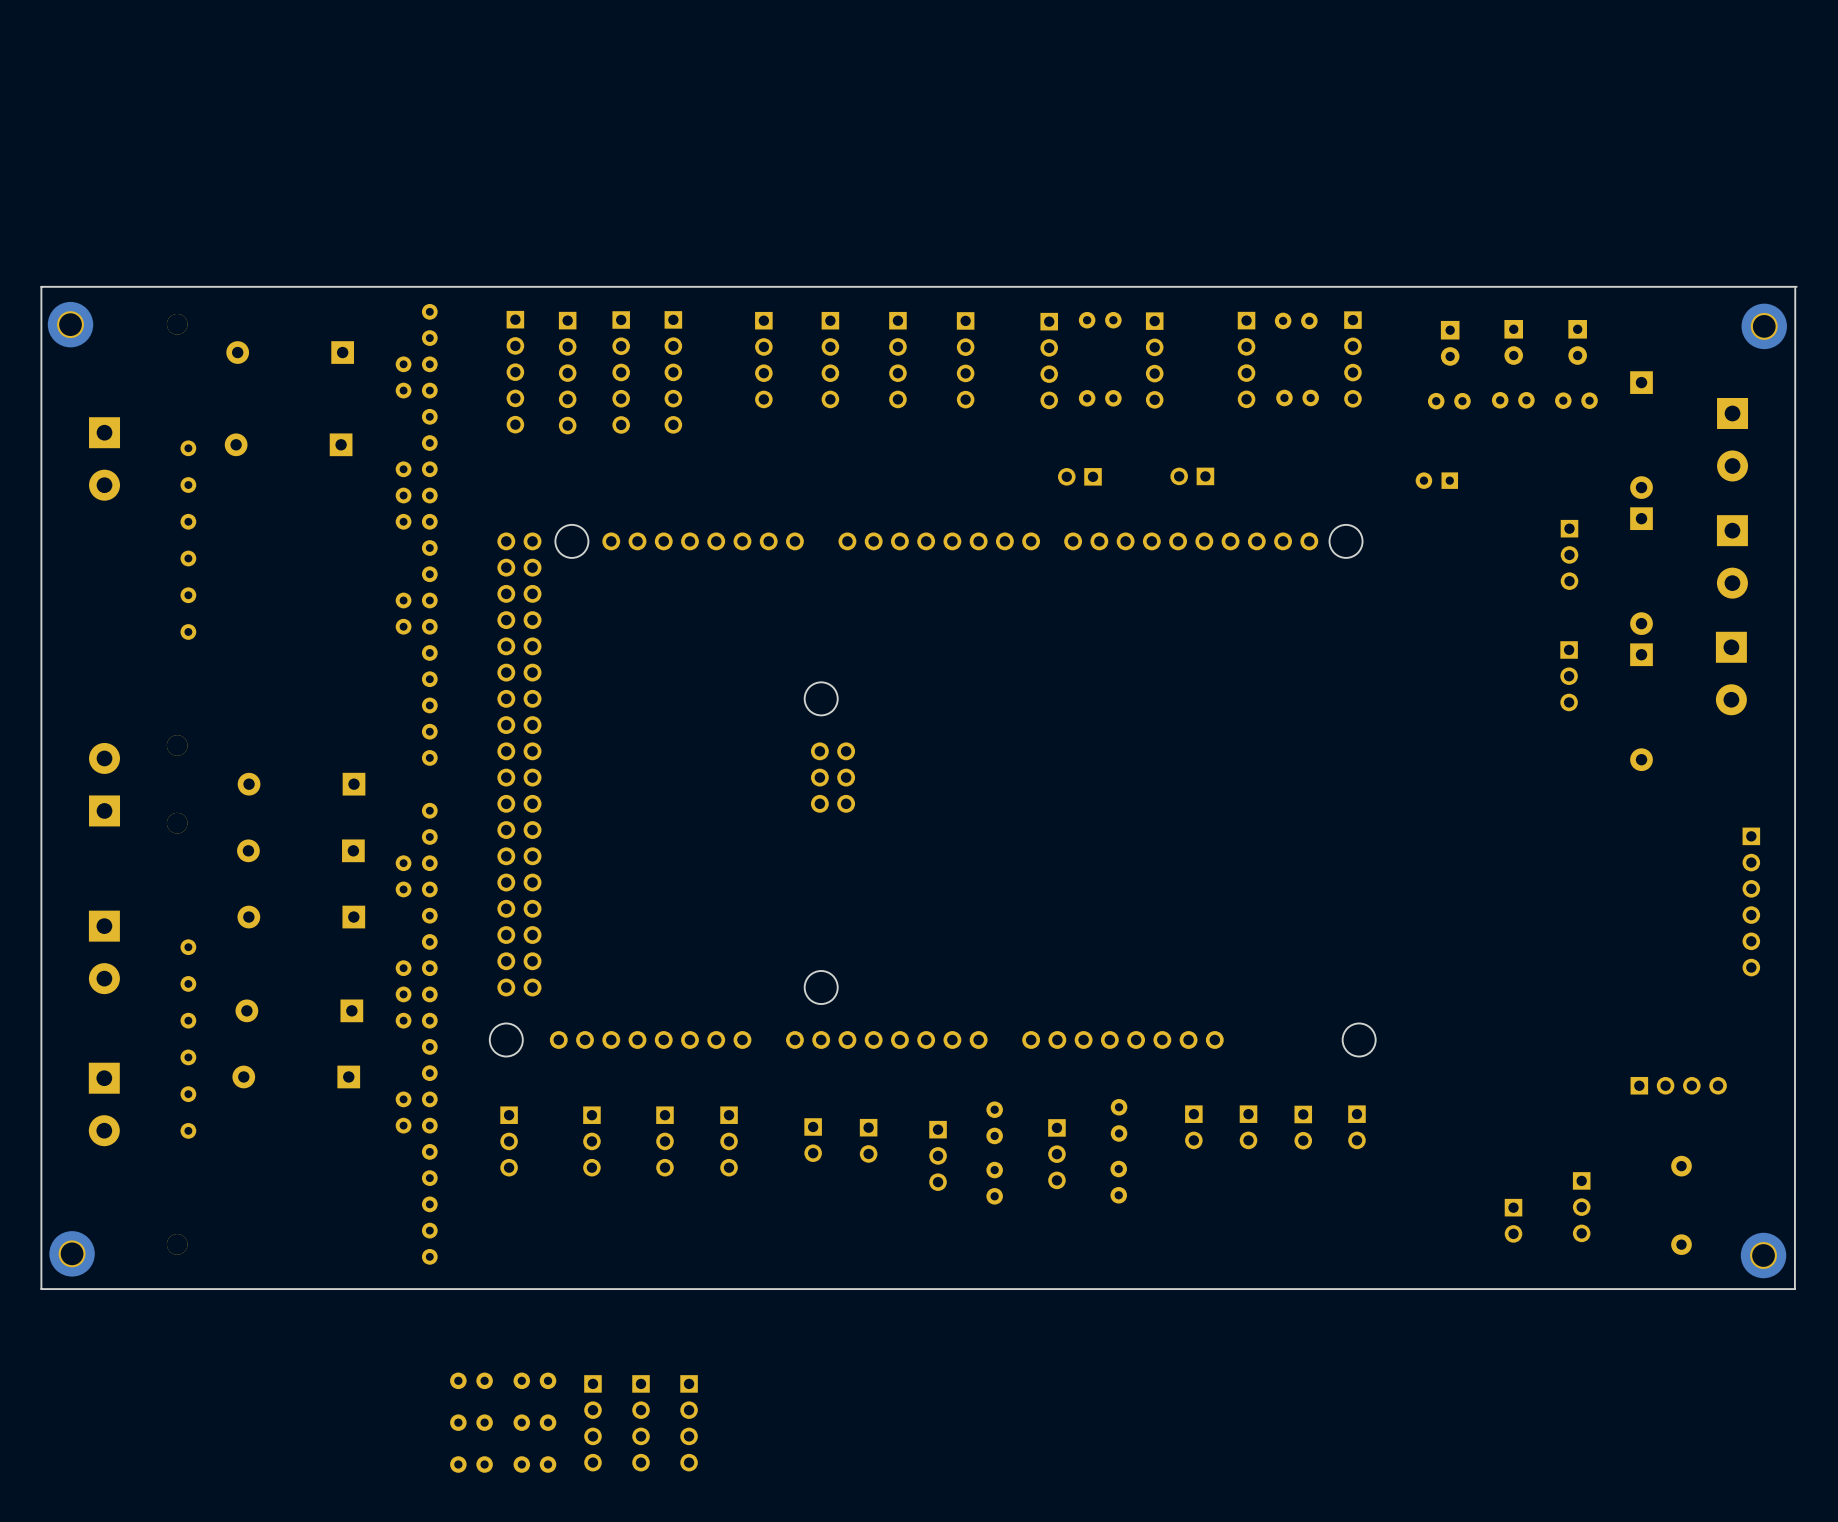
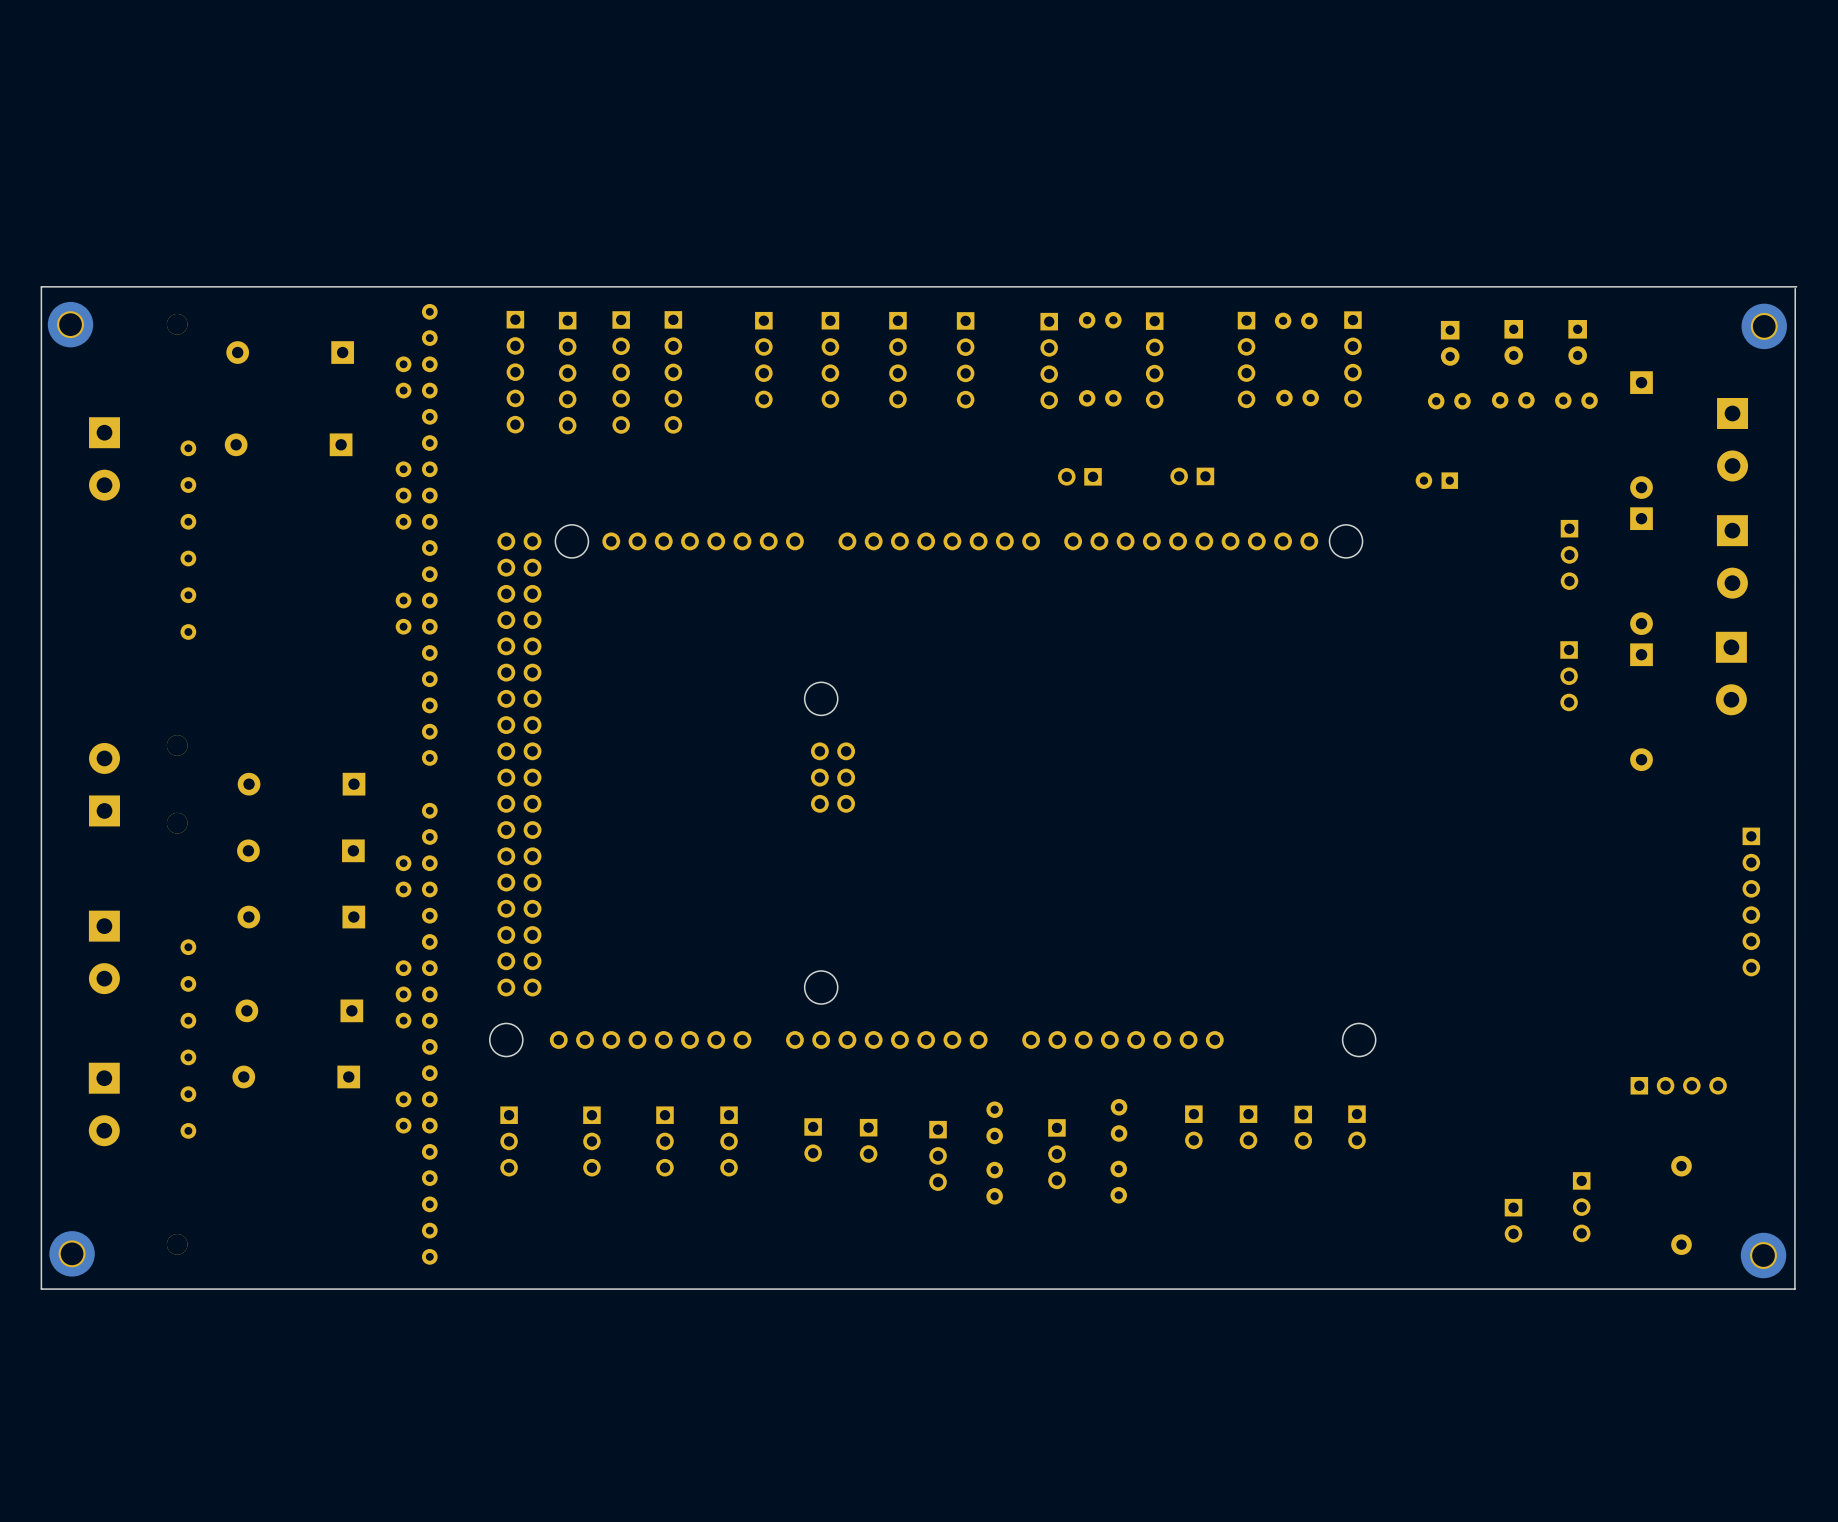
part: (471, 1380) -> none
part: (534, 1380) -> none
part: (471, 1422) -> none
part: (534, 1422) -> none
part: (592, 1423) -> none
part: (641, 1423) -> none
part: (689, 1423) -> none
part: (471, 1464) -> none
part: (534, 1464) -> none

